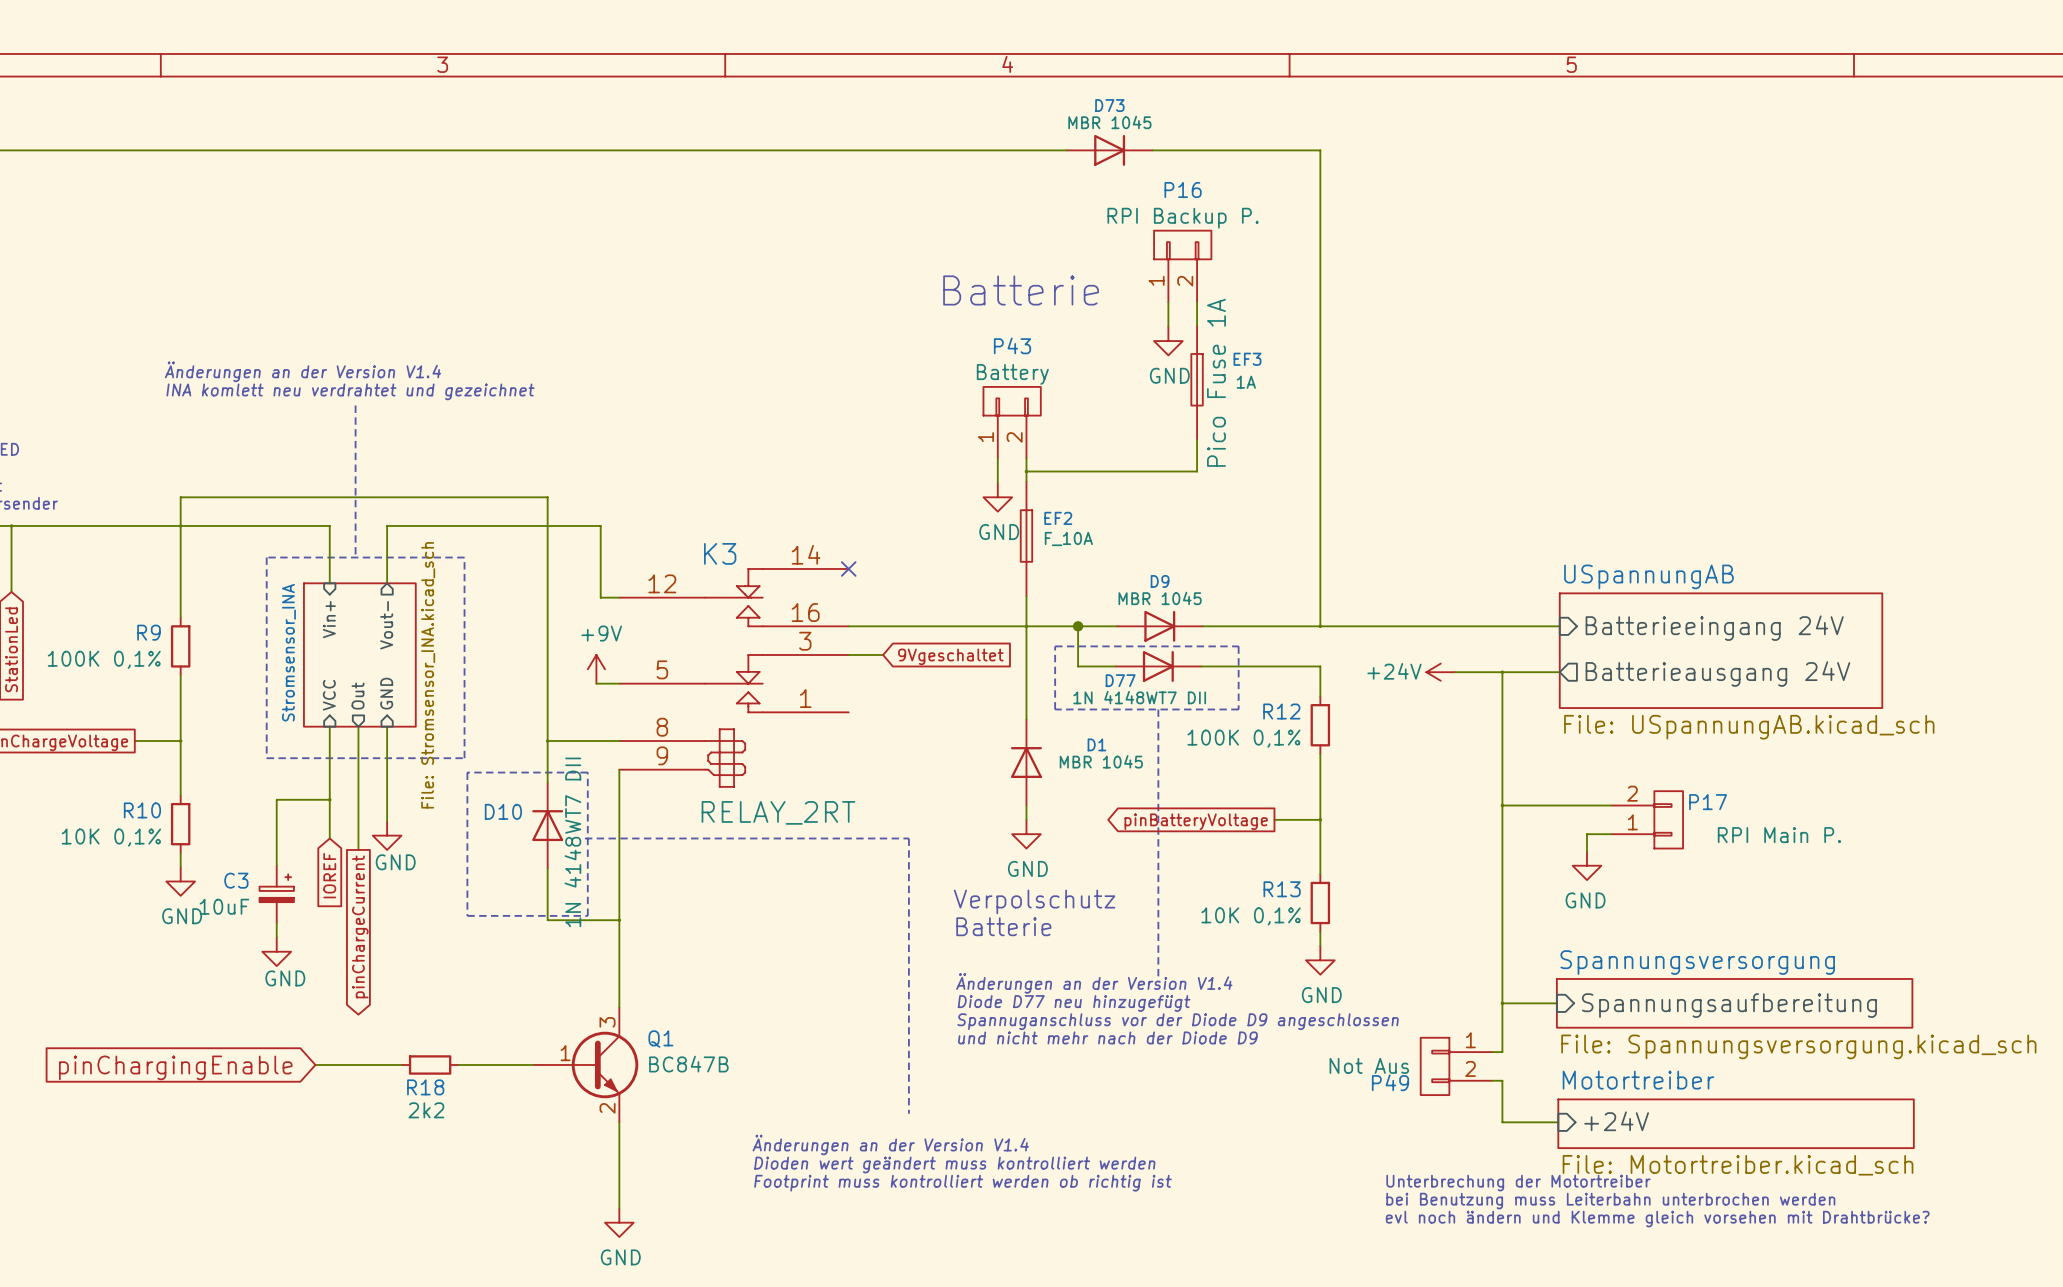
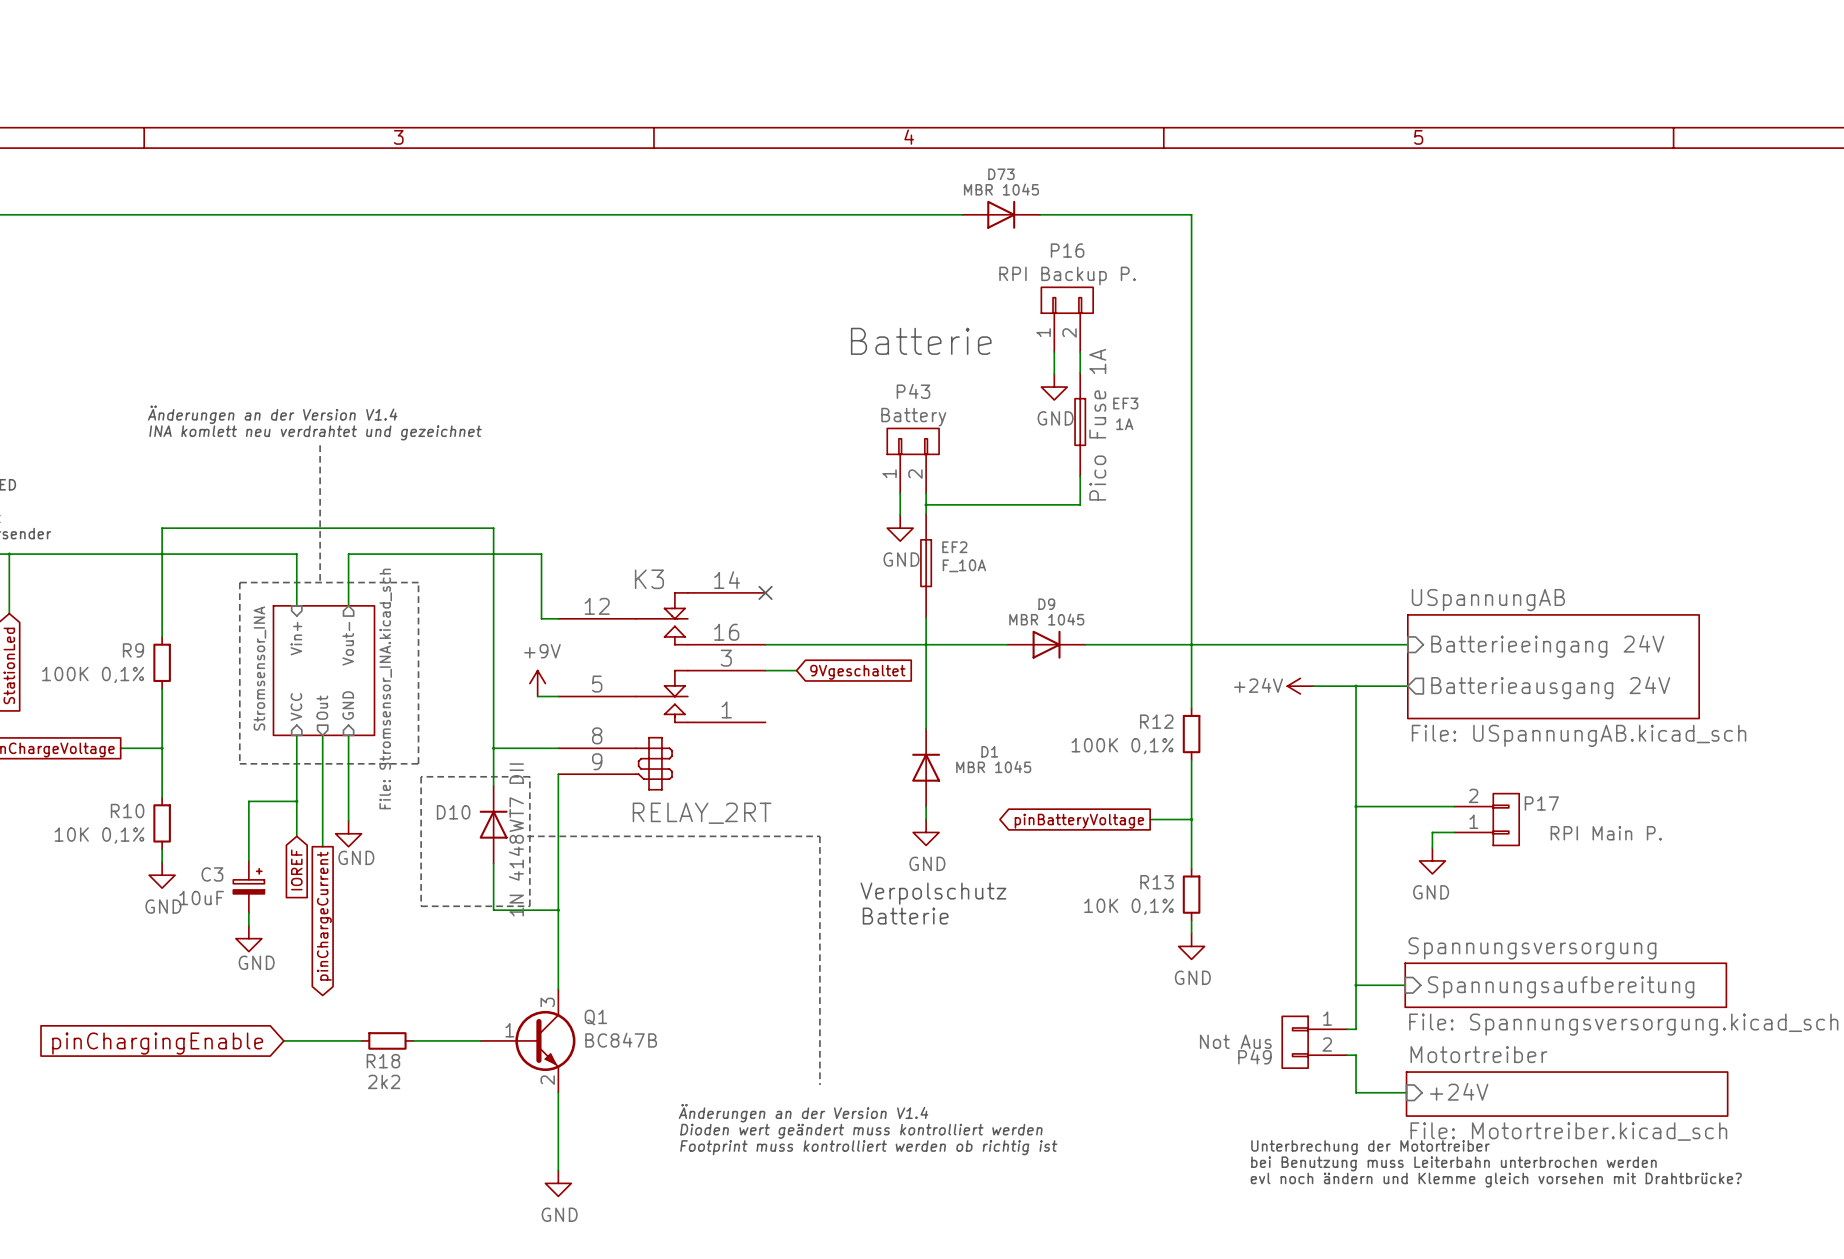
wire: (1078, 626) (1078, 666) (1115, 666) -> none
junction: (1078, 626) -> none
line: (1055, 646) (1238, 646) (1238, 709) (1055, 709) (1055, 646) -> none
D77: 1N 4148WT7 DII (1158, 666) -> none
wire: (1201, 666) (1320, 666) -> (1191, 644) (1191, 680)
line: (1158, 709) (1158, 981) -> none
text: Änderungen an der Version V1.4 (1094, 983) -> none
text: Diode D77 neu hinzugefügt (1074, 1003) -> none
text: Spannuganschluss vor der Diode D9 angeschlossen (1178, 1021) -> none
text: und nicht mehr nach der Diode D9 (1107, 1037) -> none

